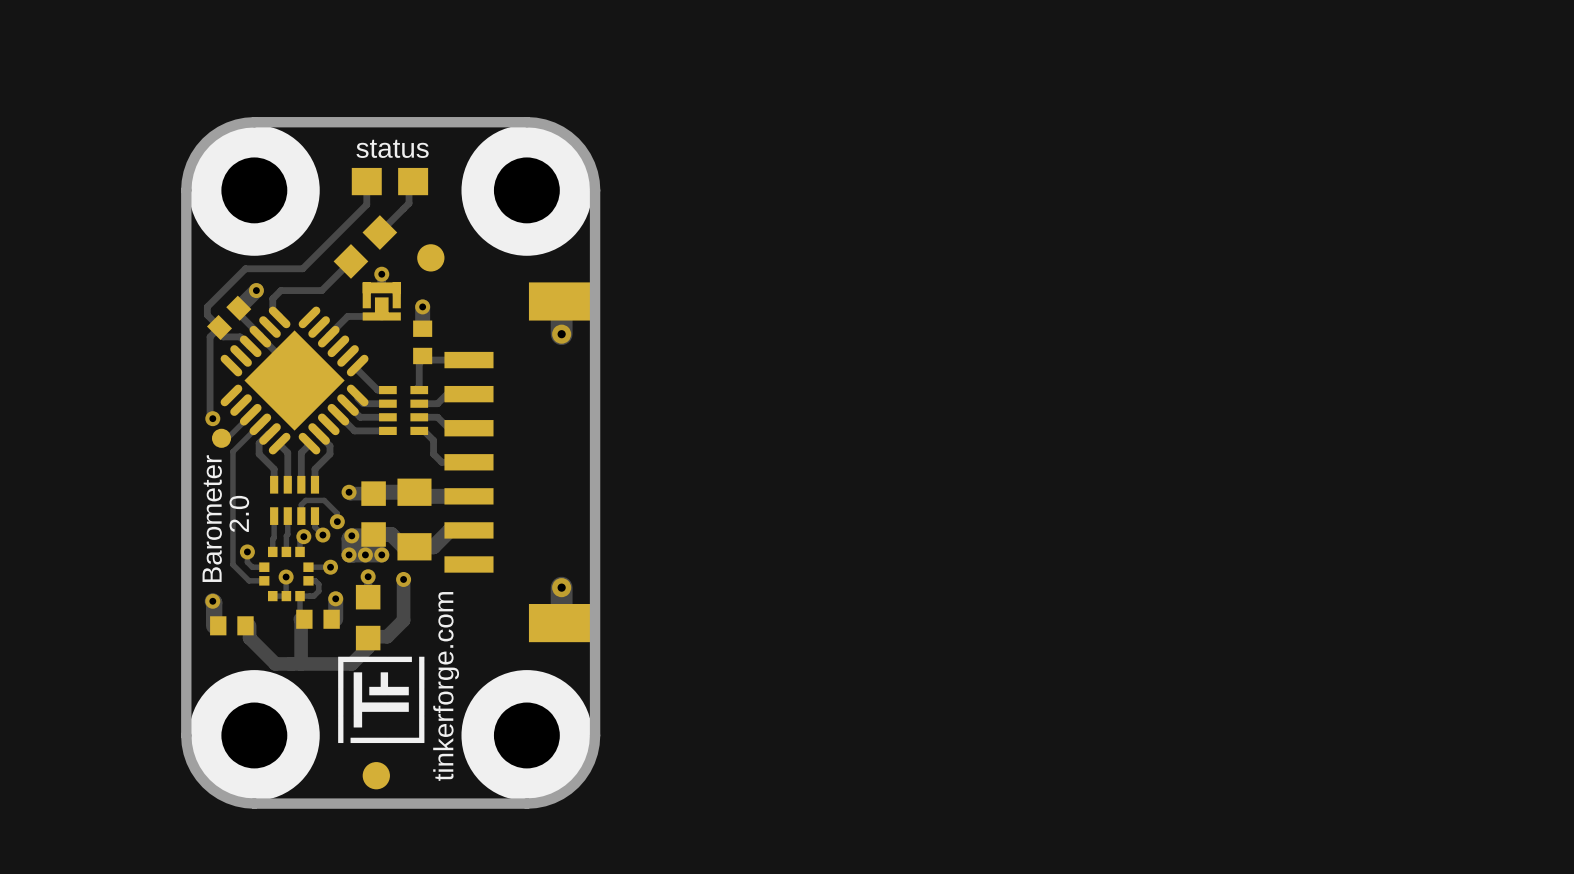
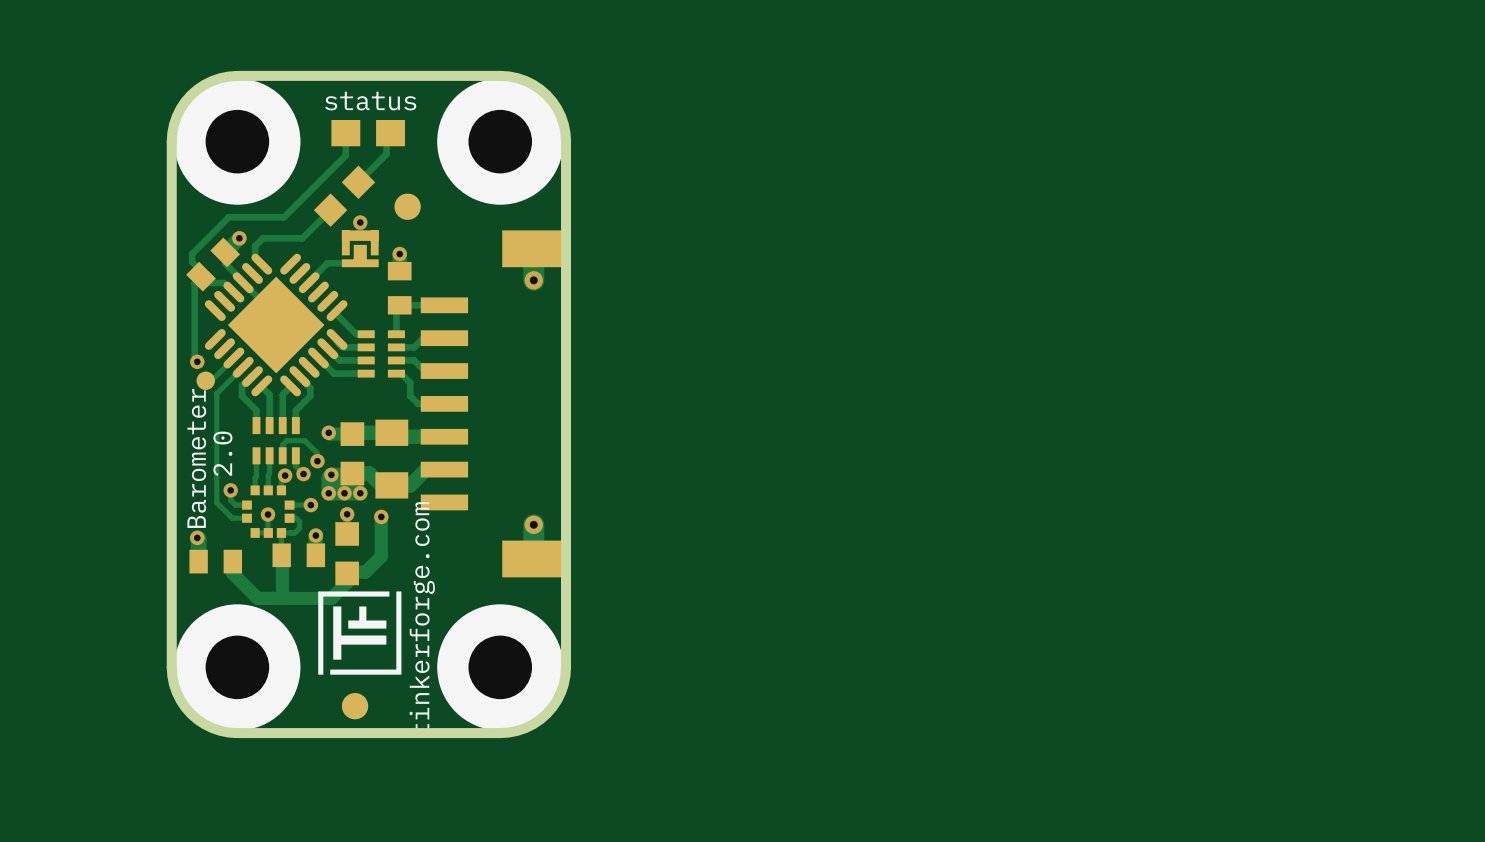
part footprint: [206, 295, 252, 340] -> [186, 237, 241, 292]
part footprint: [413, 320, 433, 365] -> [387, 261, 412, 315]
part footprint: [296, 609, 340, 629] -> [272, 543, 326, 568]
part footprint: [210, 616, 254, 636] -> [189, 549, 243, 574]

